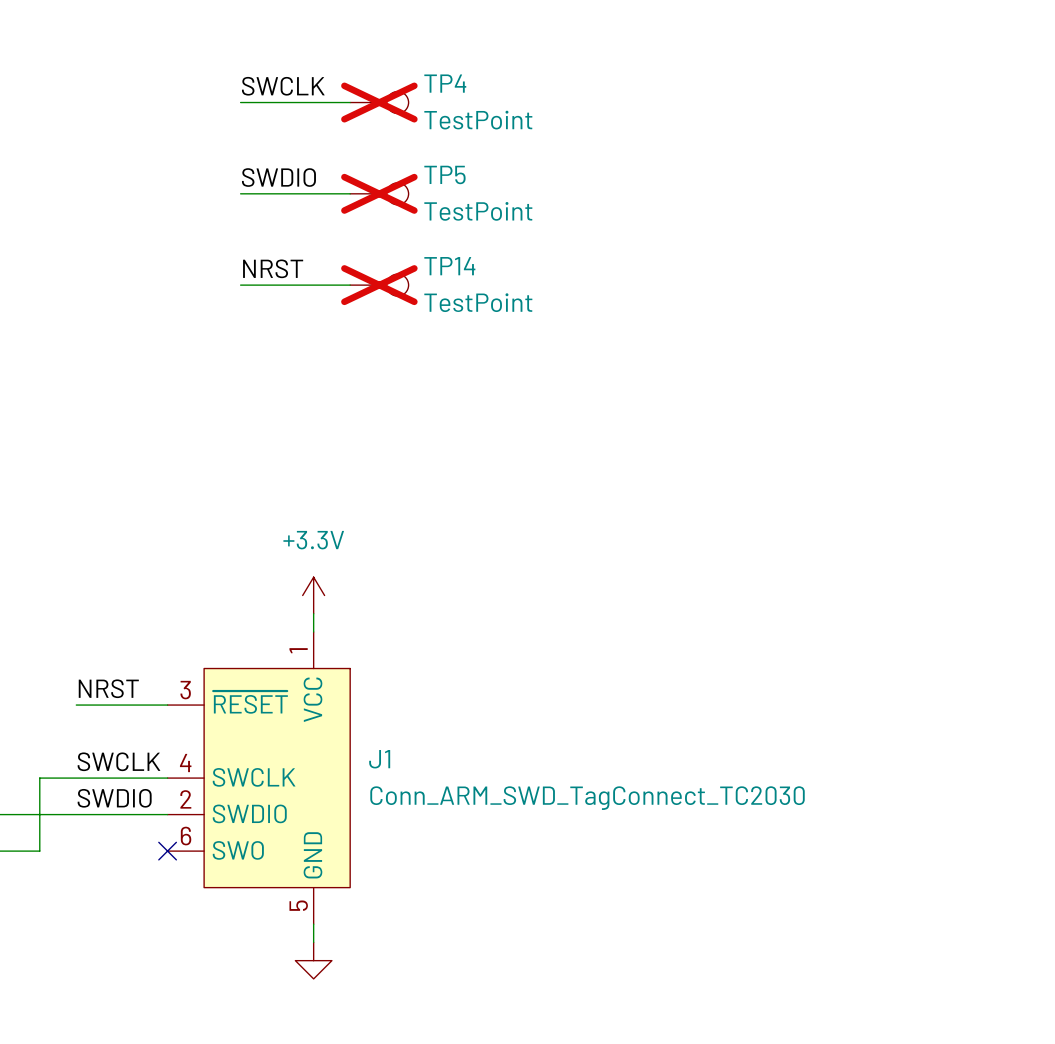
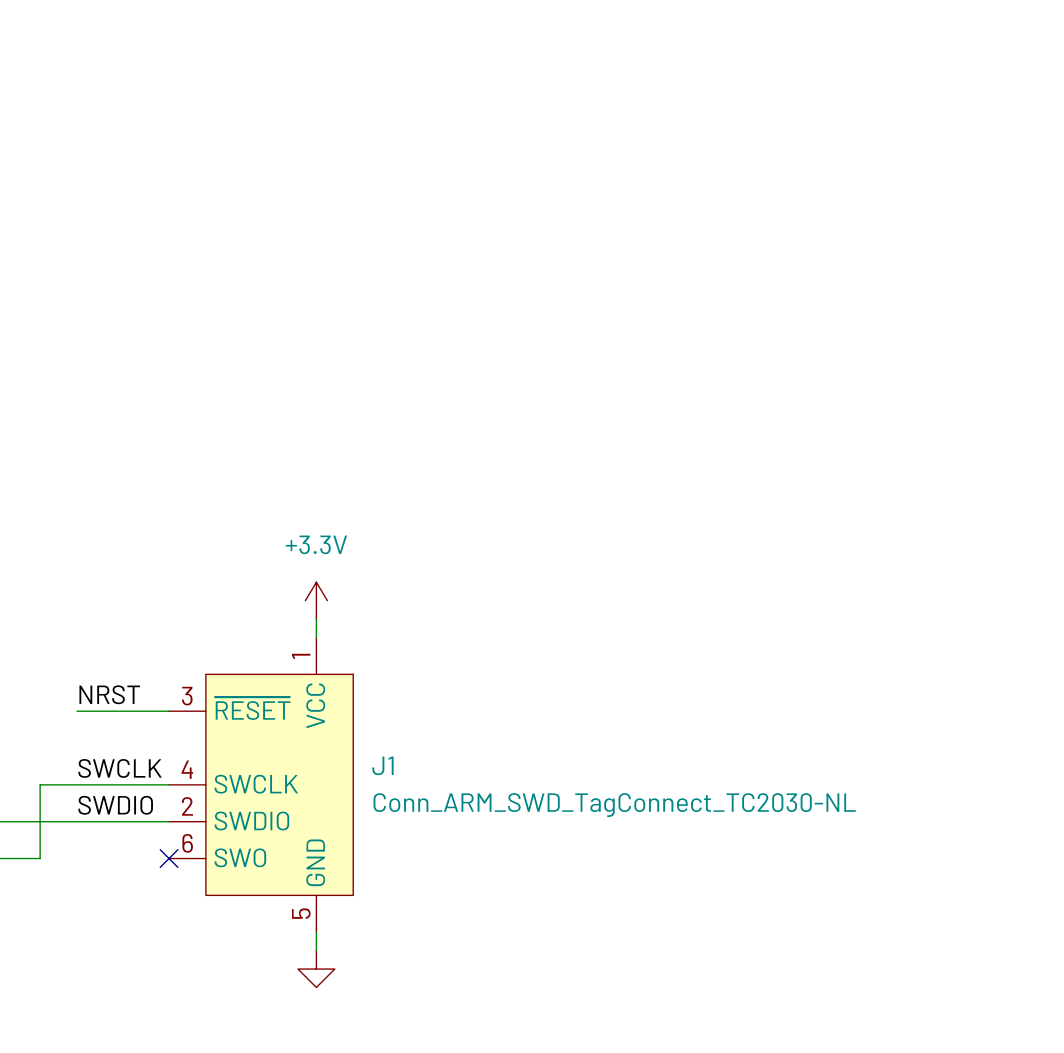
label: SWCLK (283, 86) -> none
wire: (240, 102) (350, 102) -> none
TP4: TestPoint (379, 102) -> none
label: SWDIO (278, 177) -> none
wire: (240, 193) (350, 193) -> none
TP5: TestPoint (379, 193) -> none
label: NRST (273, 268) -> none
wire: (240, 285) (350, 285) -> none
TP14: TestPoint (379, 285) -> none
J1 value: Conn_ARM_SWD_TagConnect_TC2030 (587, 798) -> Conn_ARM_SWD_TagConnect_TC2030-NL (614, 805)

